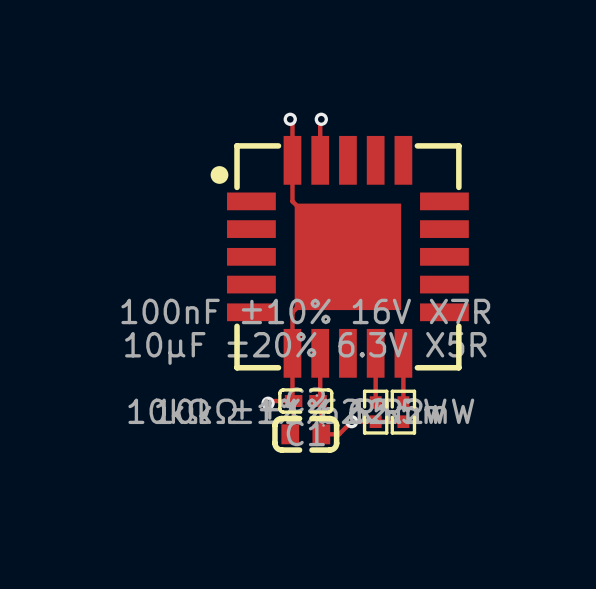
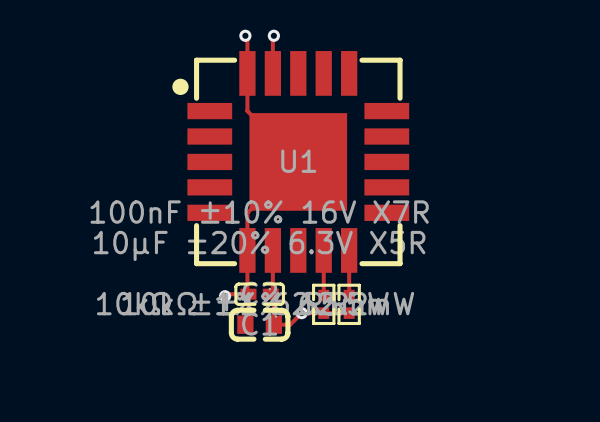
U1 name: none -> U1 (298, 161)

